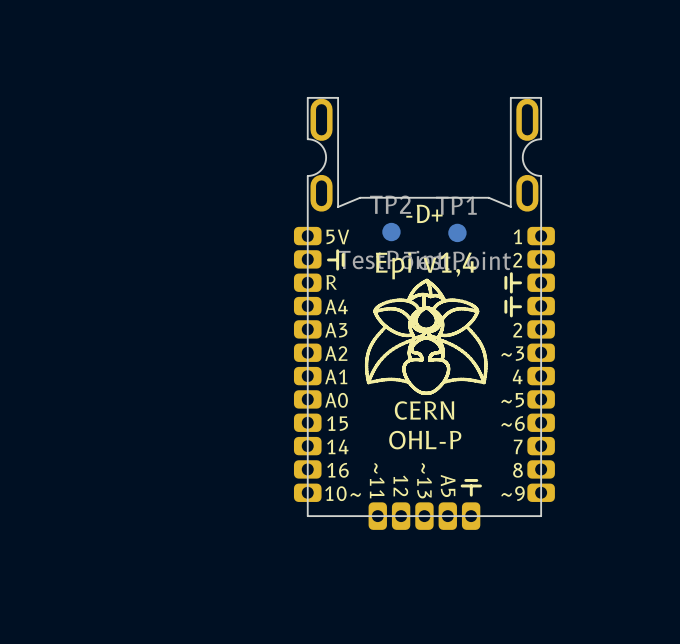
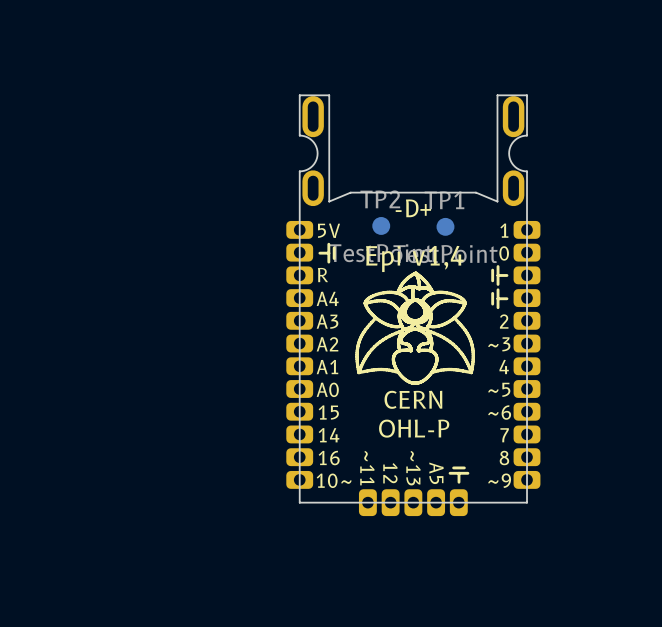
text: 2 (517, 260) -> 0 (504, 253)

